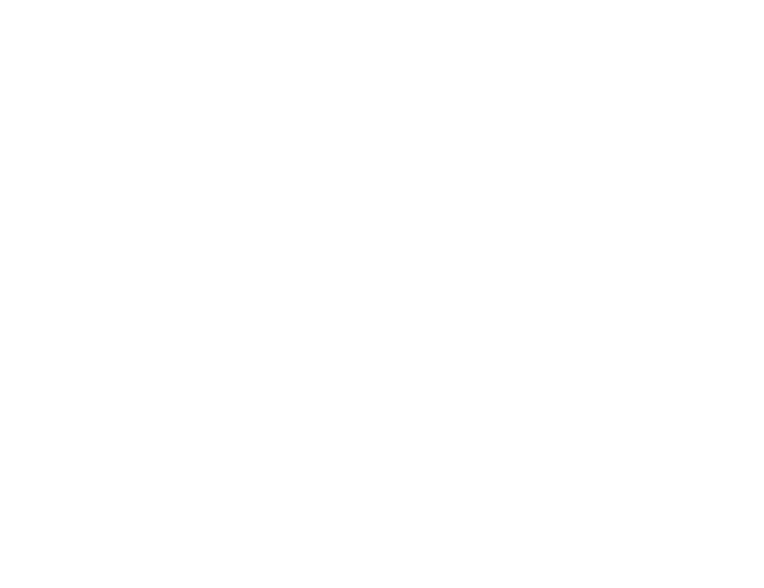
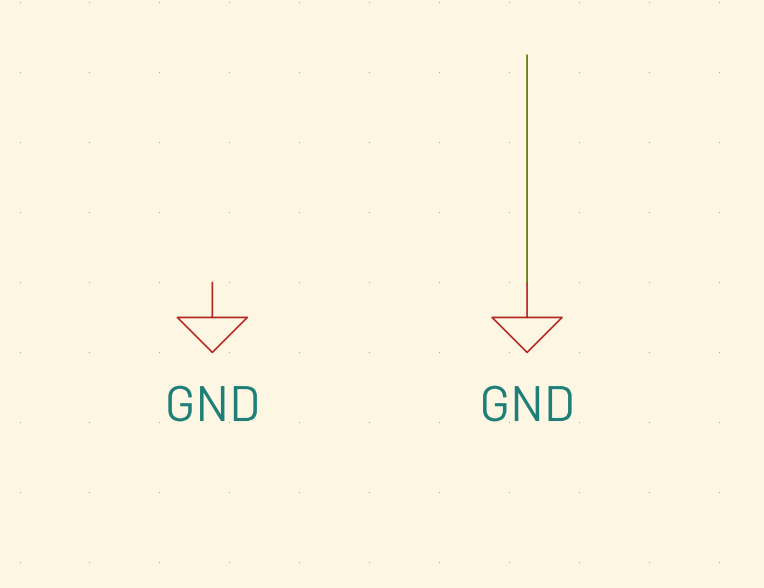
wire: none -> (527, 55) (527, 282)
power symbol: none -> GND (212, 317)
power symbol: none -> GND (527, 317)

